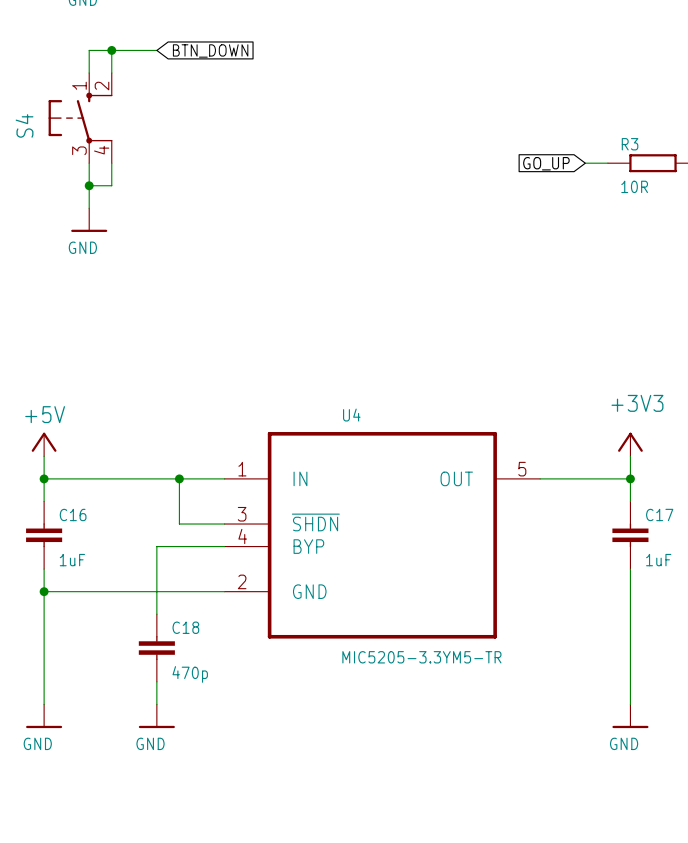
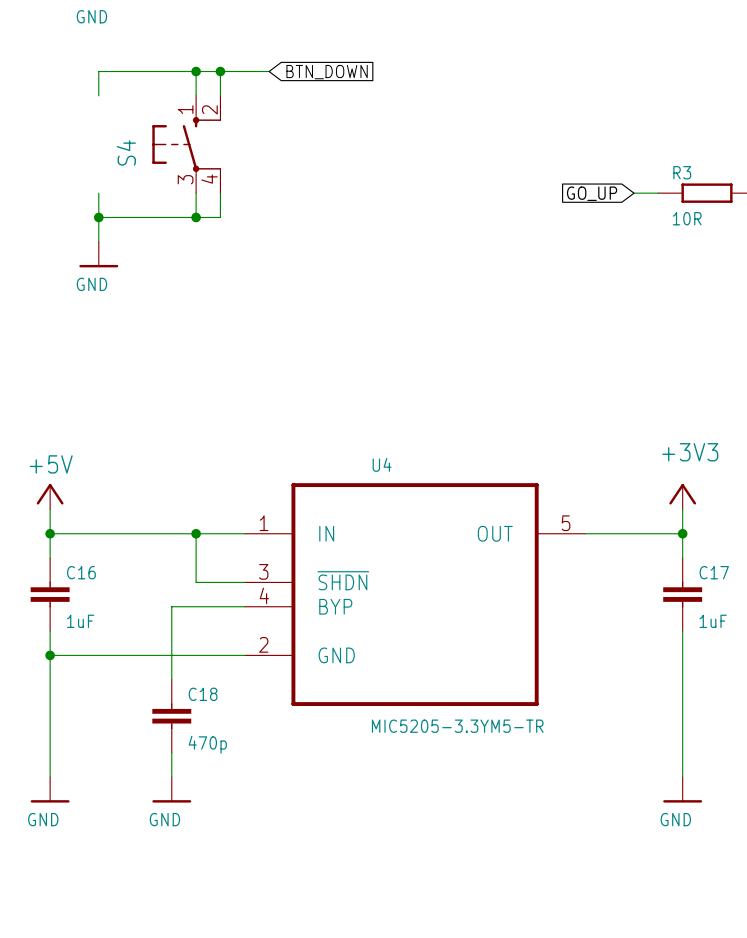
wire: (111, 50) (111, 72) -> (196, 71) (196, 95)
junction: (111, 50) -> none
wire: none -> (171, 71) (269, 71)
junction: none -> (196, 71)
wire: none -> (220, 71) (220, 95)
junction: none -> (220, 71)
global label position: BTN_DOWN (210, 50) -> BTN_DOWN (327, 72)
S4 position: (80, 118) -> (186, 144)
wire: (111, 163) (111, 185) -> (220, 193) (220, 217) (123, 217)
wire: none -> (196, 193) (196, 217)
junction: none -> (196, 217)

